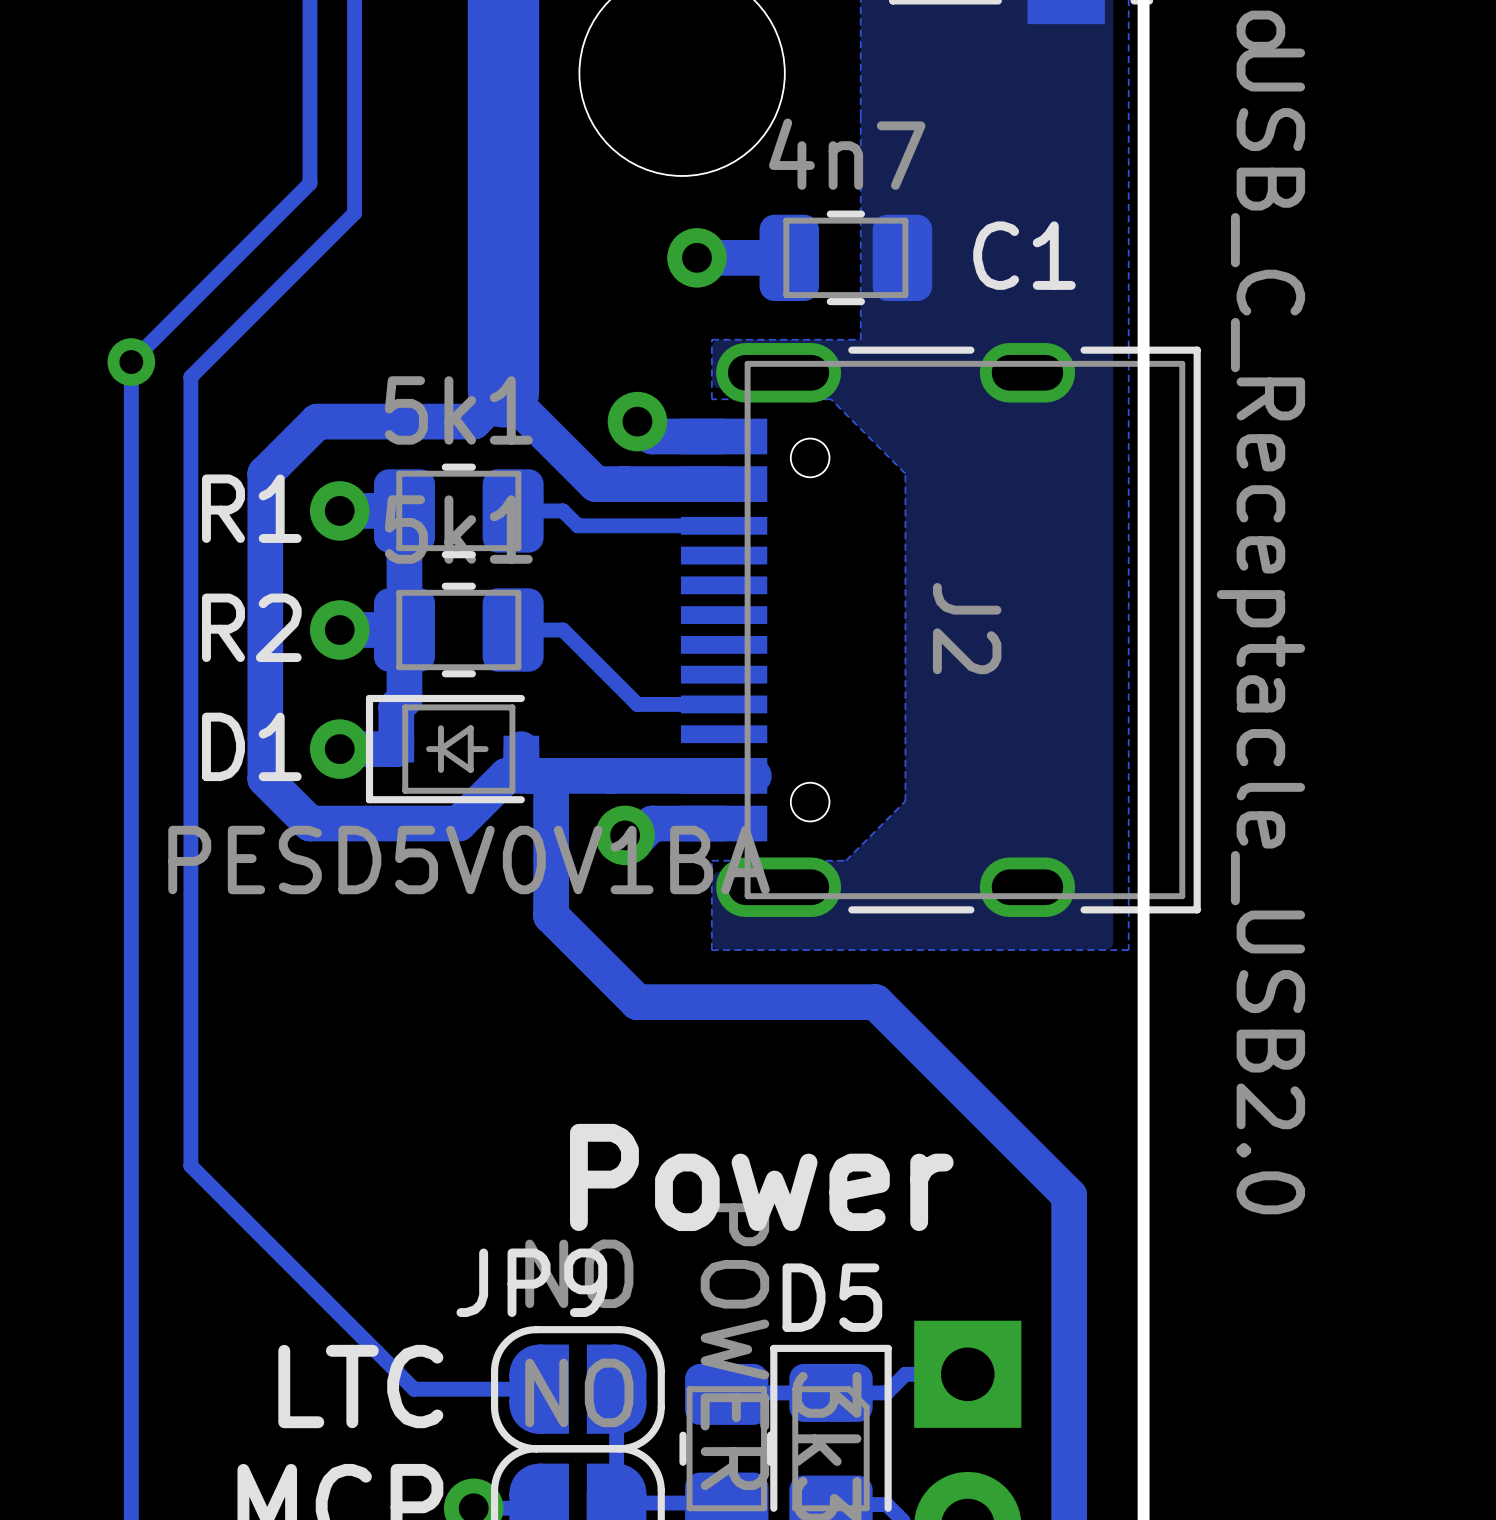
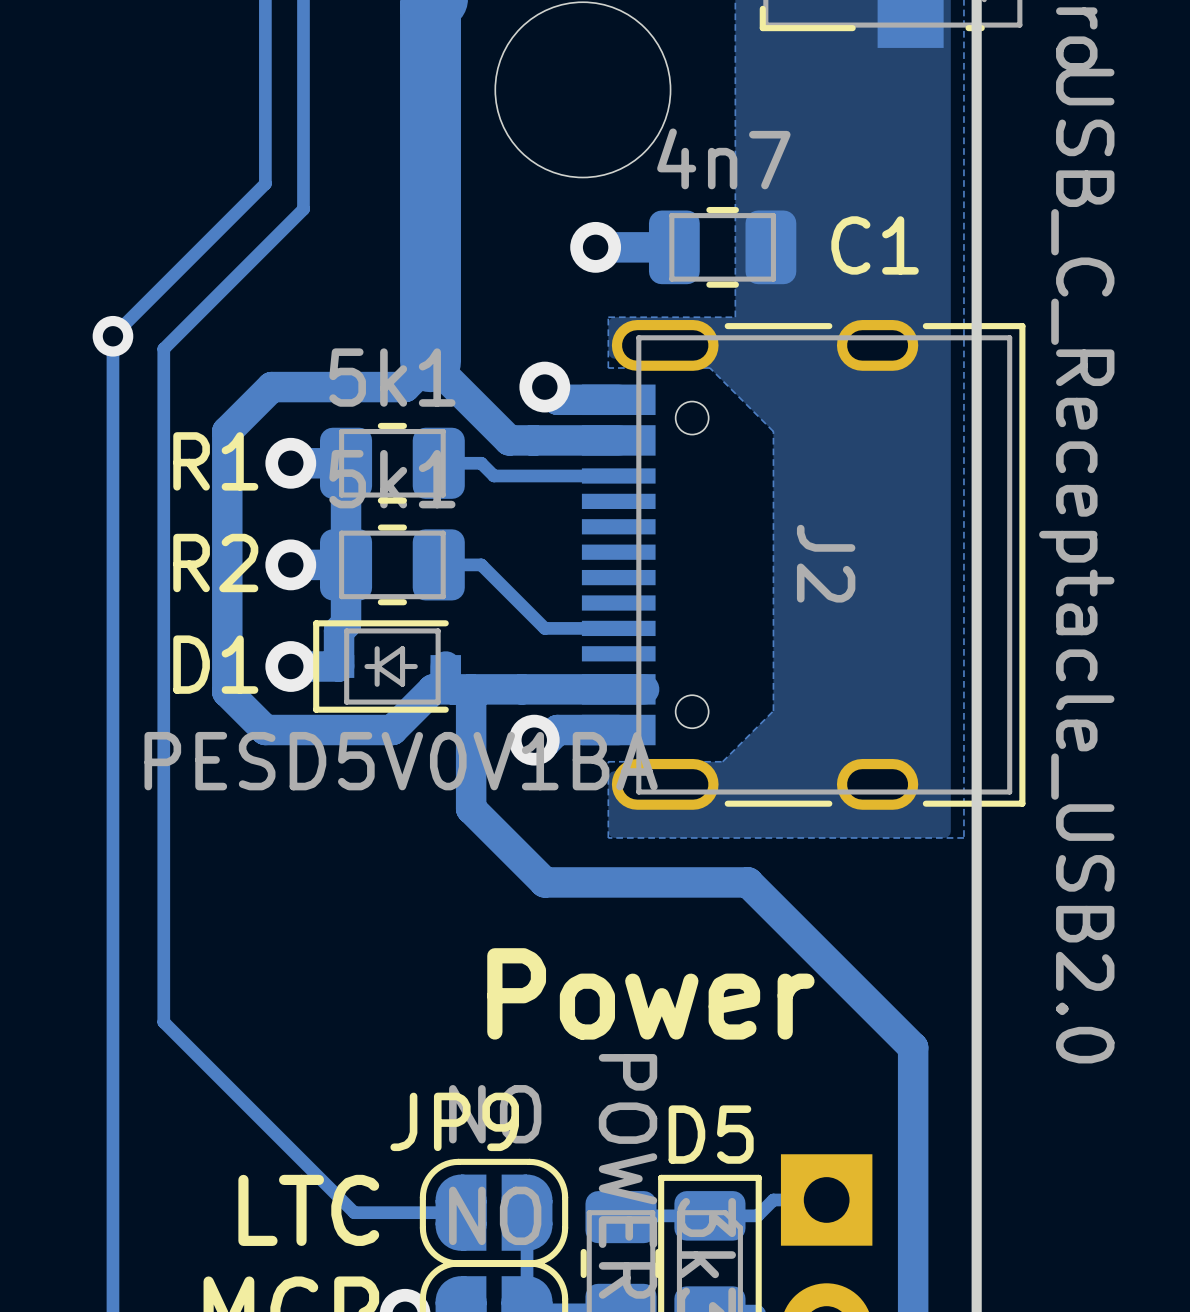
text position: Power (761, 1177) -> Power (650, 993)

